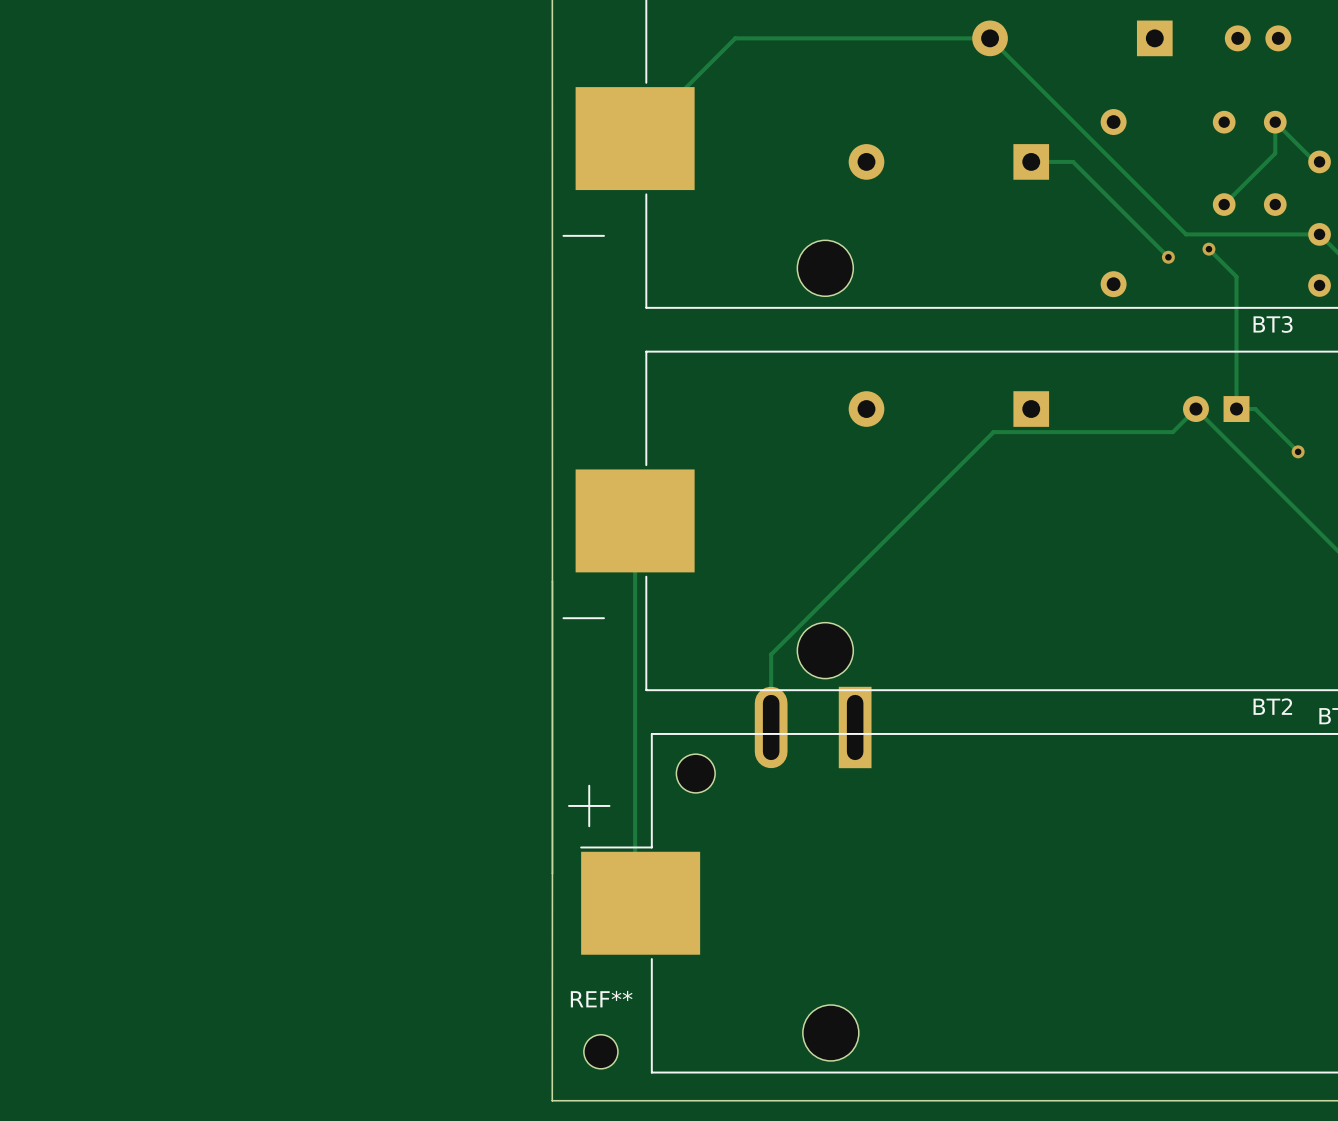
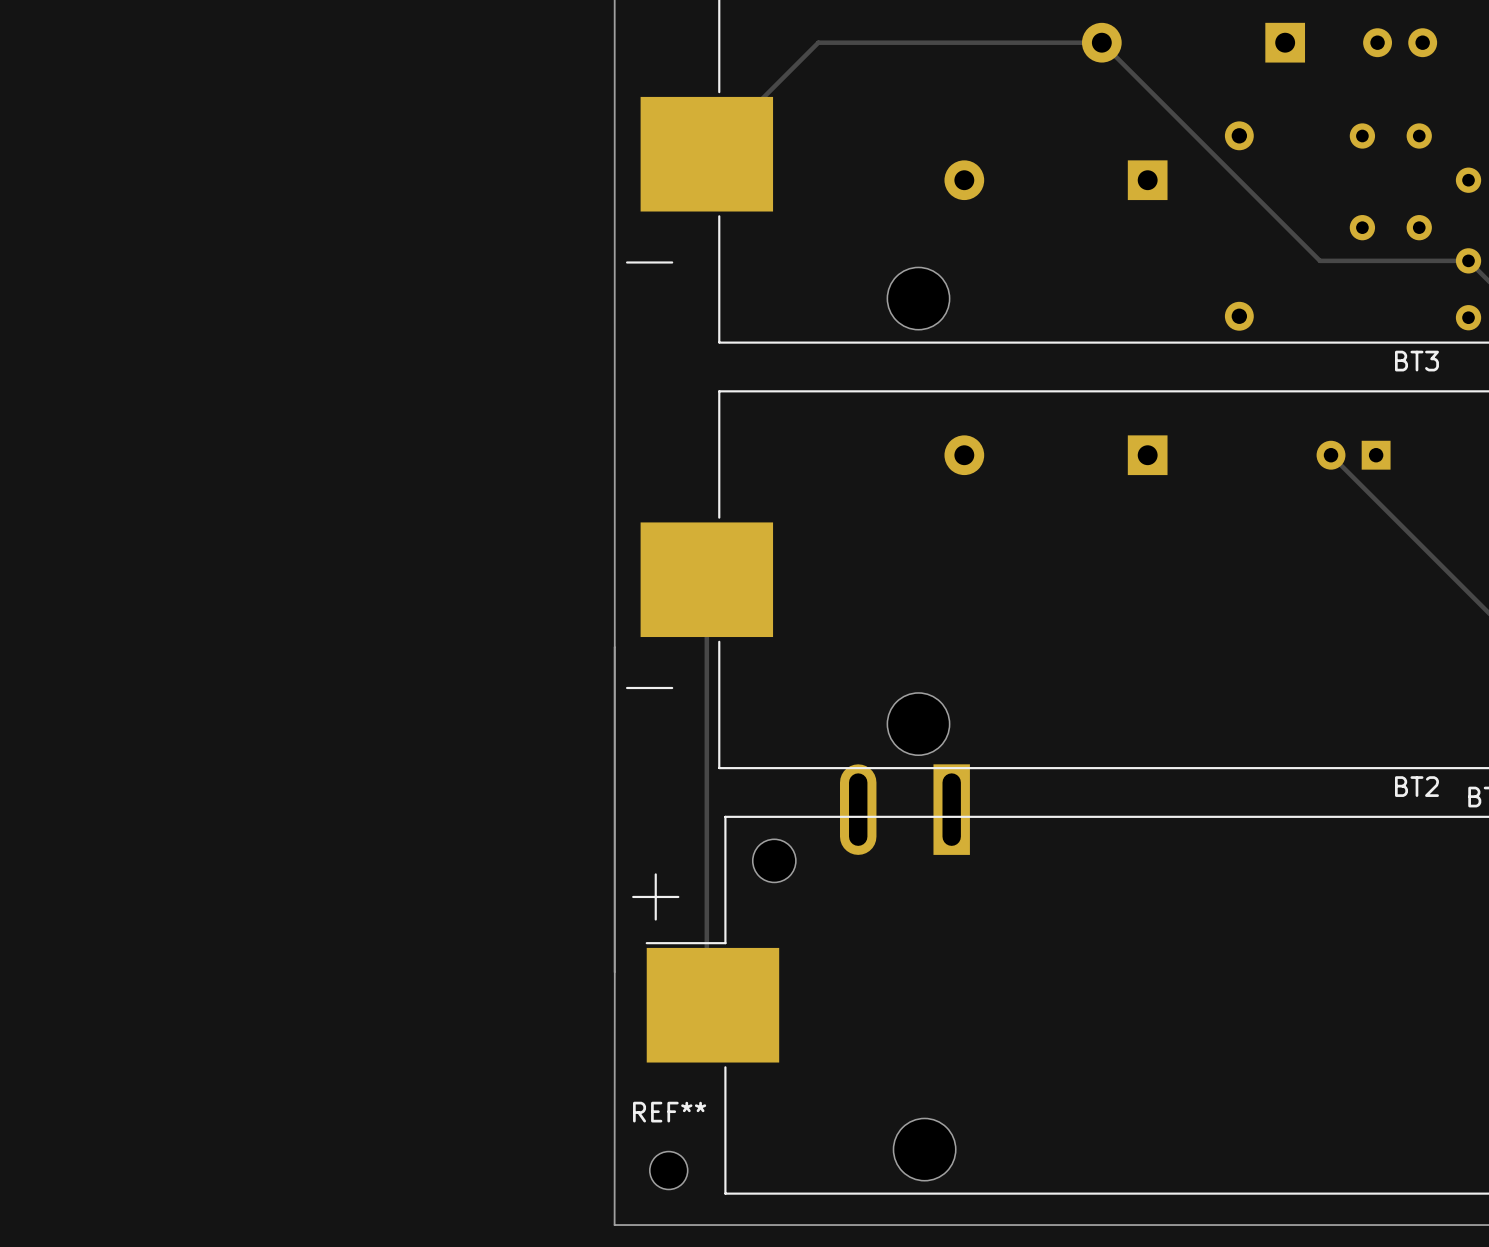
track: (1031, 161) (1073, 161) (1168, 257) -> none
track: (1319, 161) (1315, 161) (1275, 122) (1275, 153) (1224, 204) -> none
track: (1208, 249) (1236, 276) (1236, 409) (1255, 409) (1298, 451) -> none
via: (1208, 249) -> none
via: (1168, 257) -> none
track: (1195, 409) (1172, 432) (993, 432) (771, 654) (771, 727) -> none
via: (1298, 451) -> none

